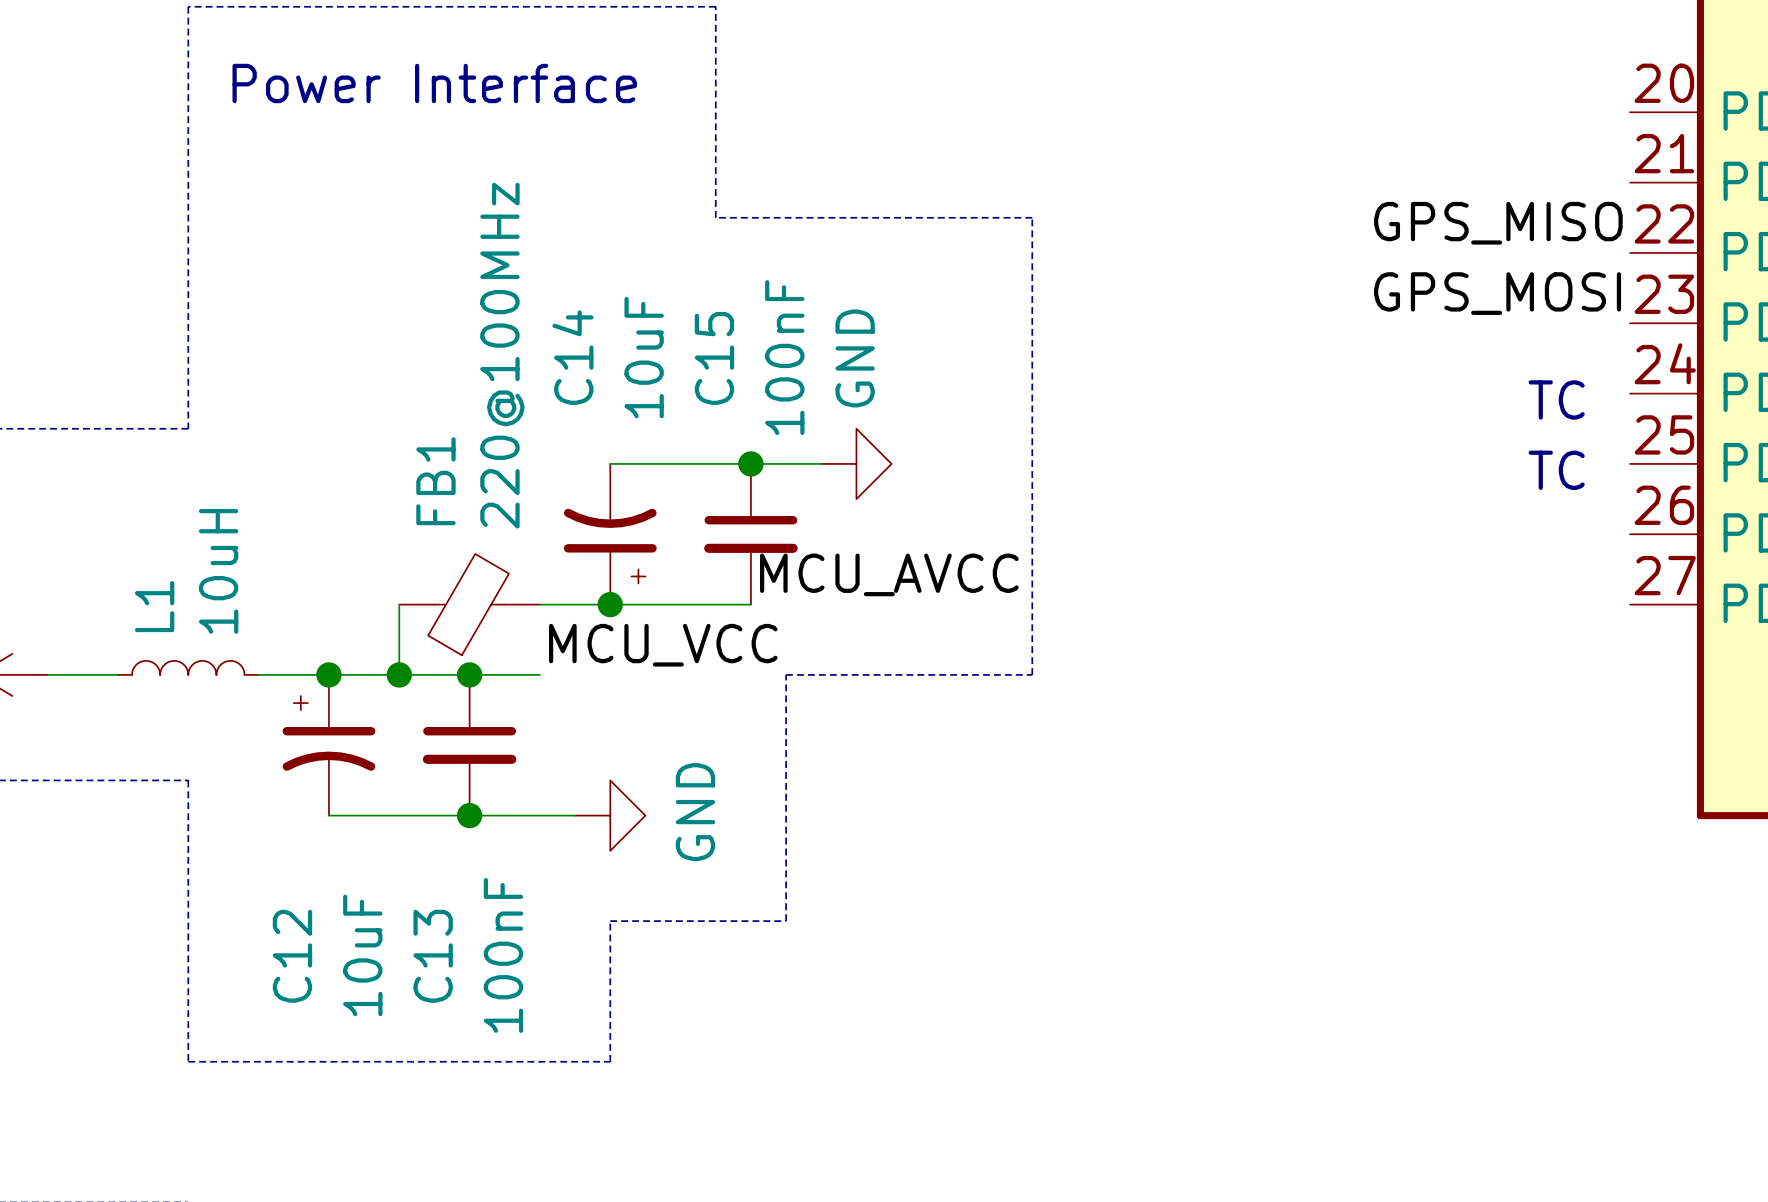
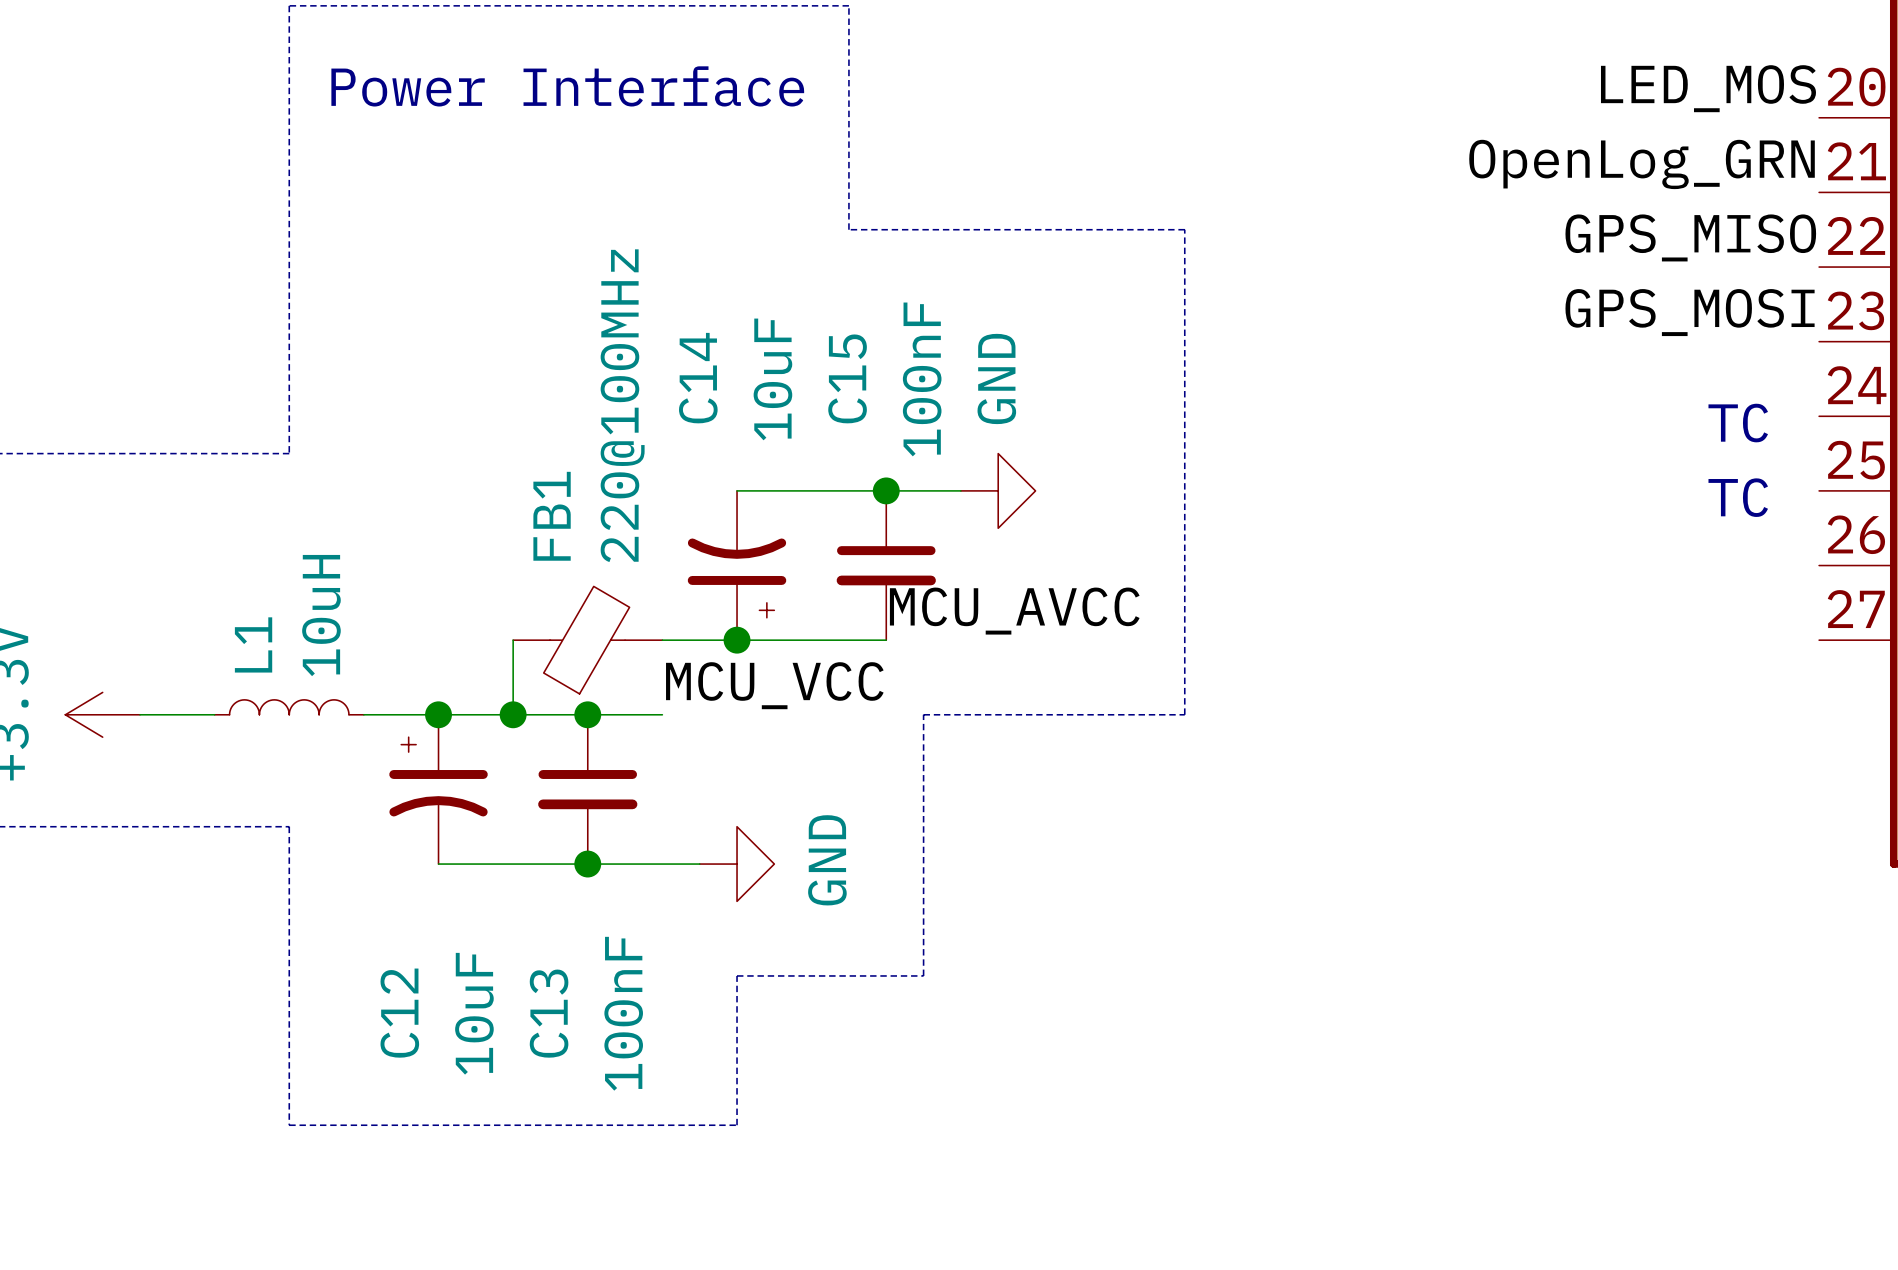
label: none -> LED_MOS (1708, 88)
label: none -> OpenLog_GRN (1642, 164)

